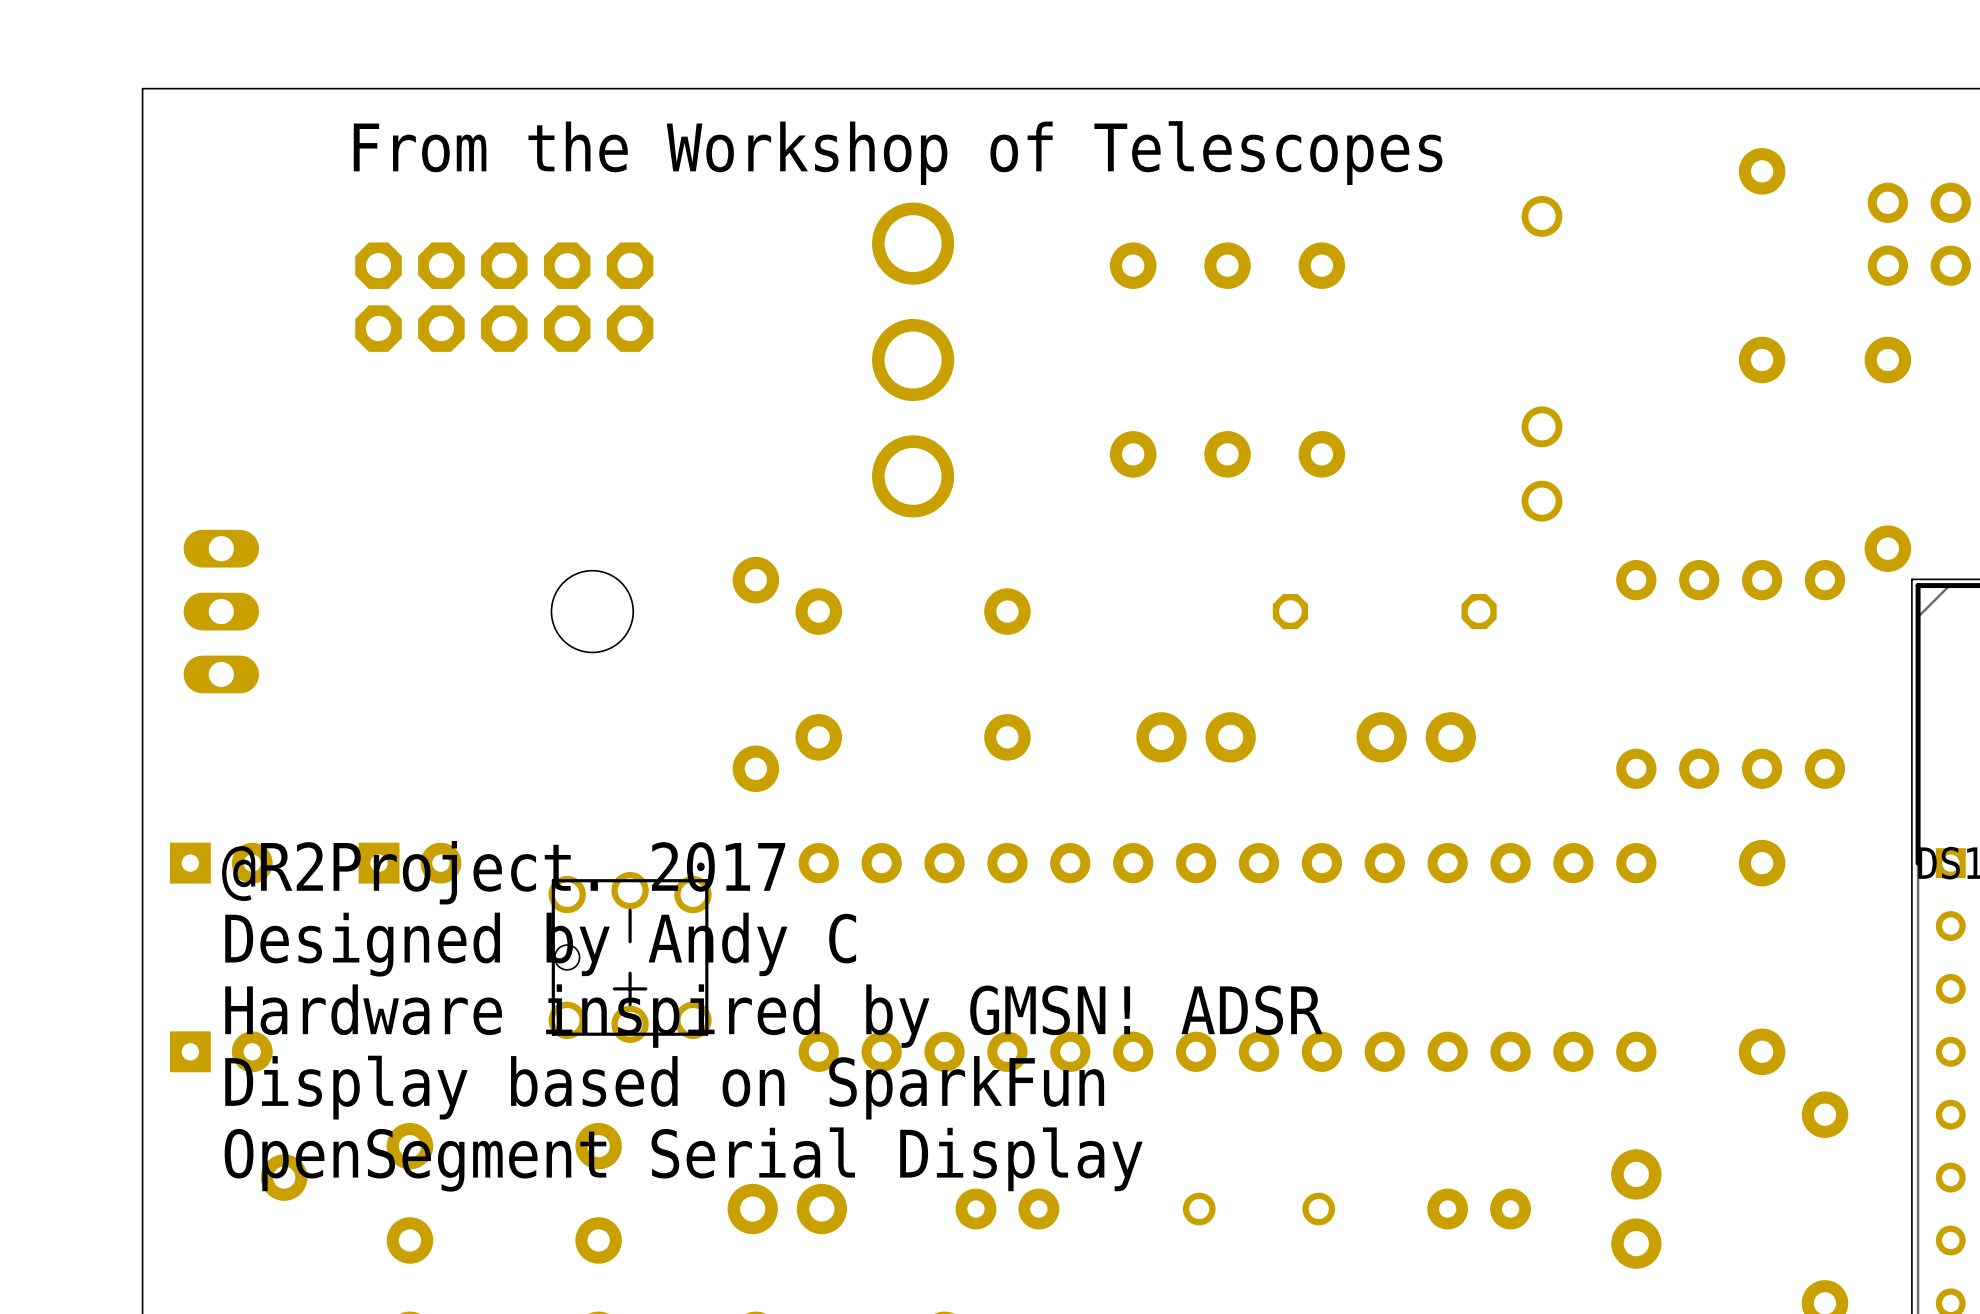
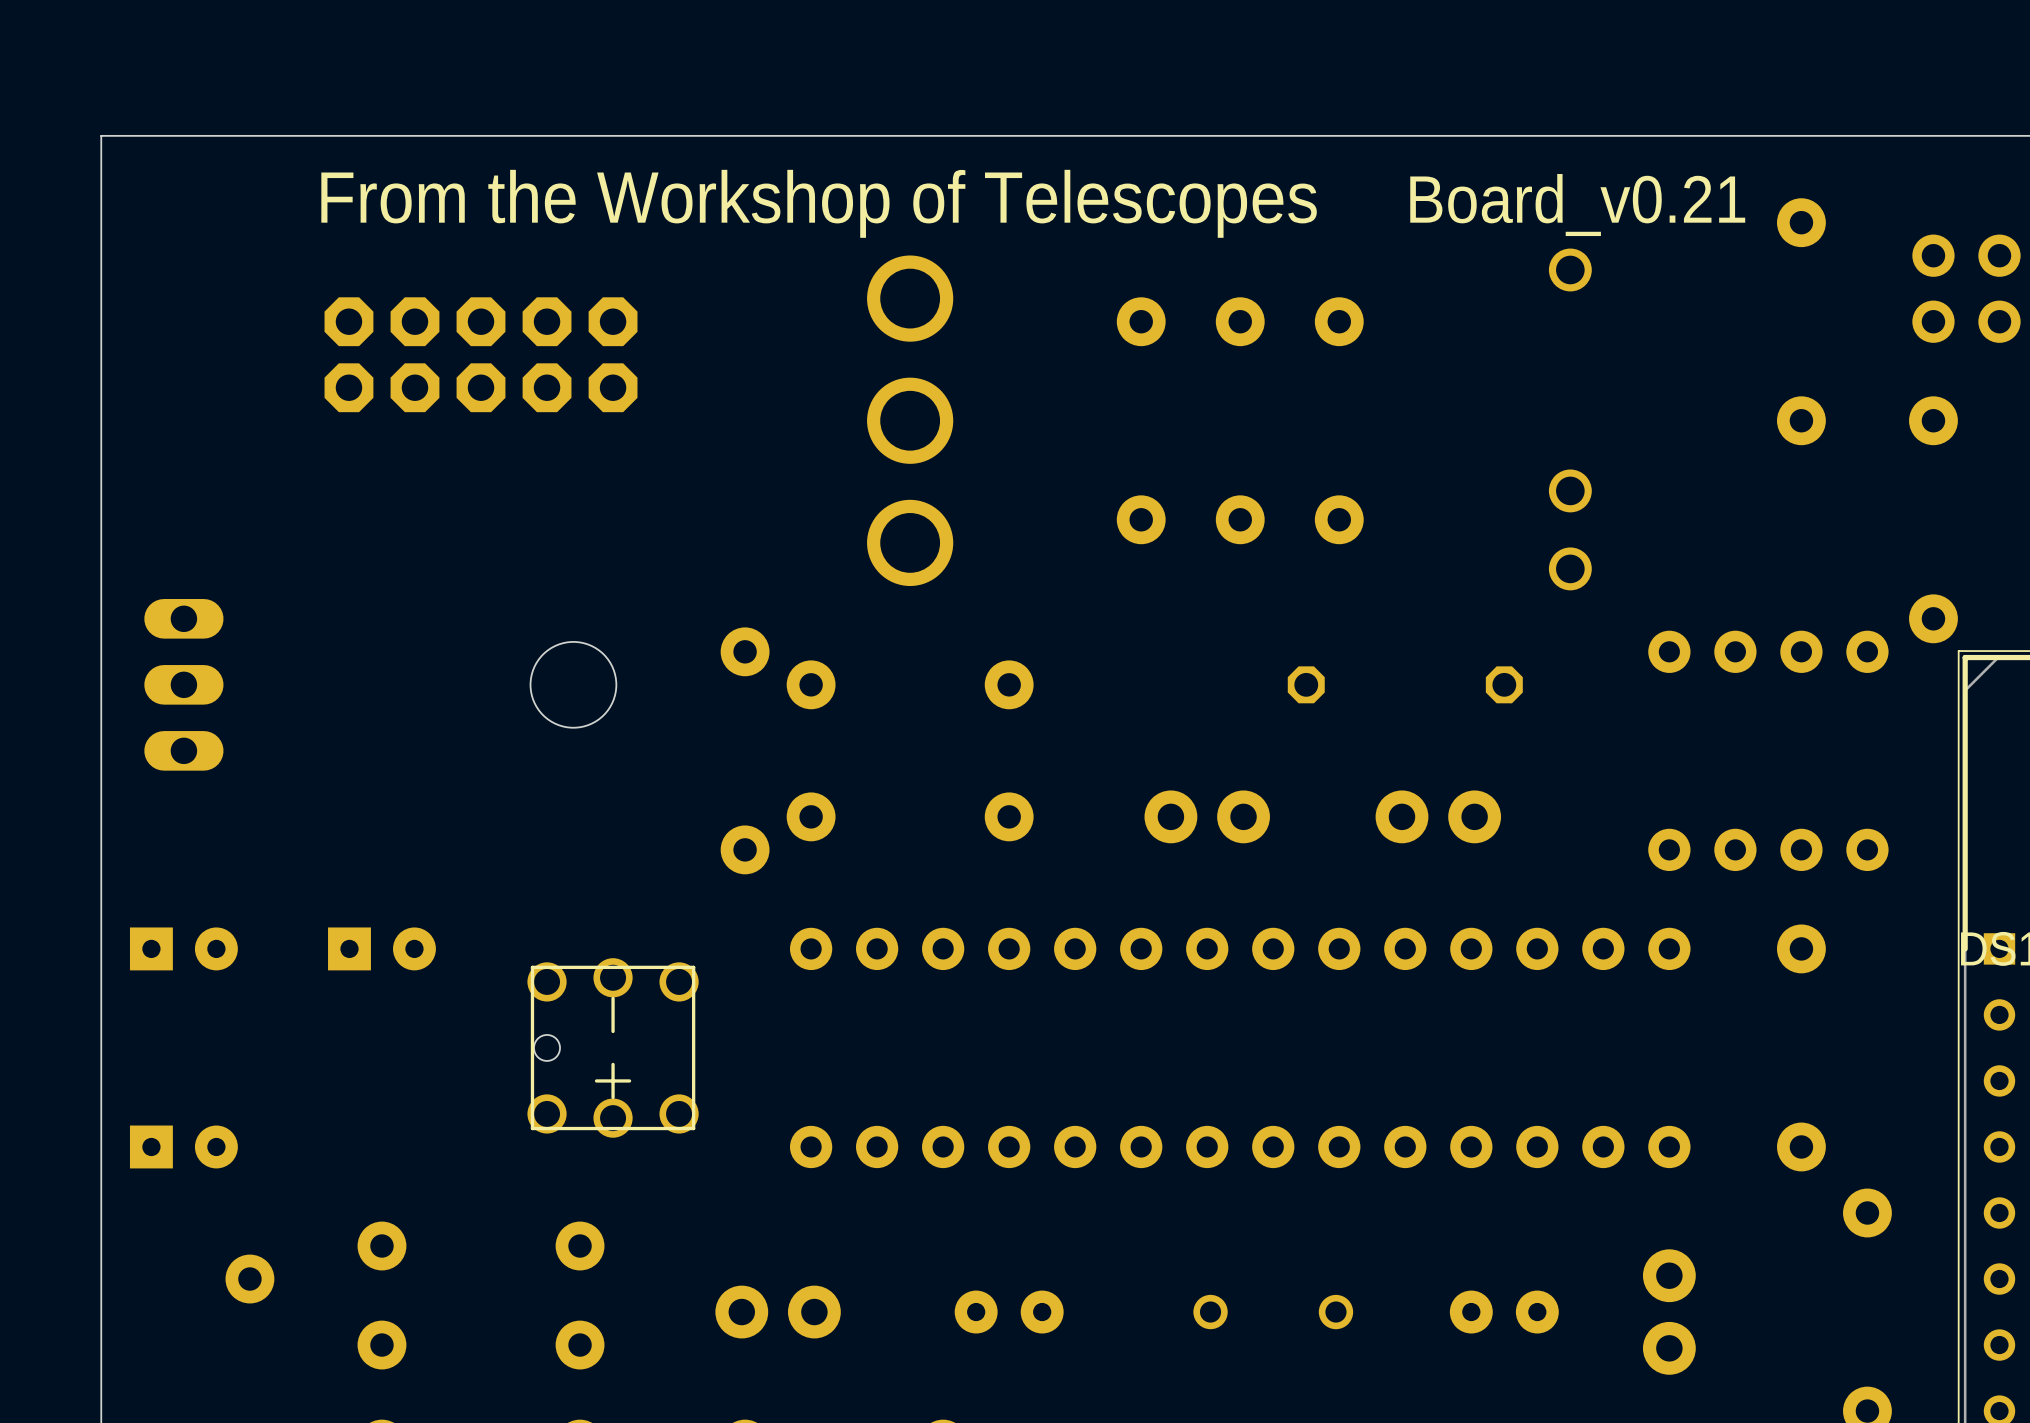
text: none -> Board_v0.21 (1577, 205)
text: @R2Project. 2017 (503, 872) -> none
text: Designed by Andy C (540, 944) -> none
text: Hardware inspired by GMSN! ADSR (773, 1016) -> none
text: Display based on SparkFun (664, 1087) -> none
text: OpenSegment Serial Display (683, 1159) -> none

